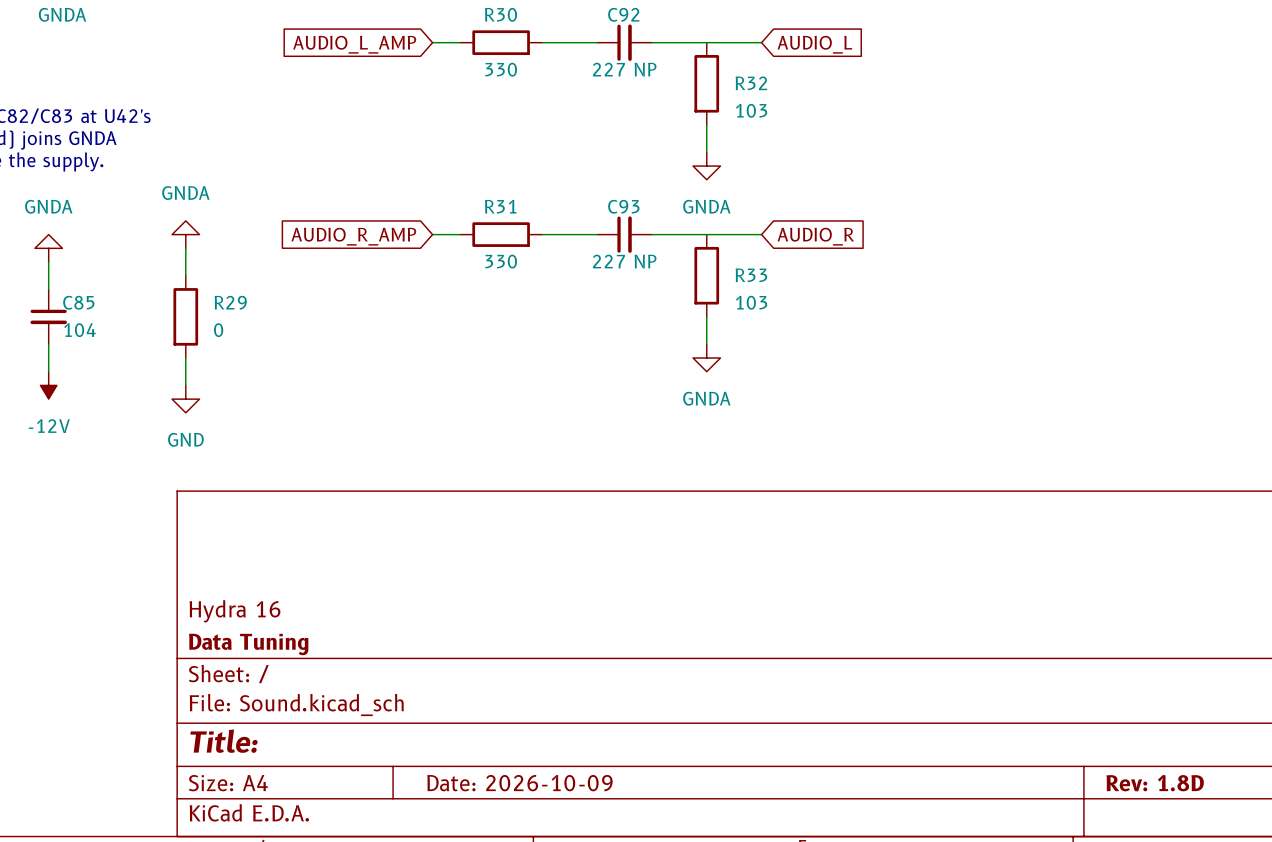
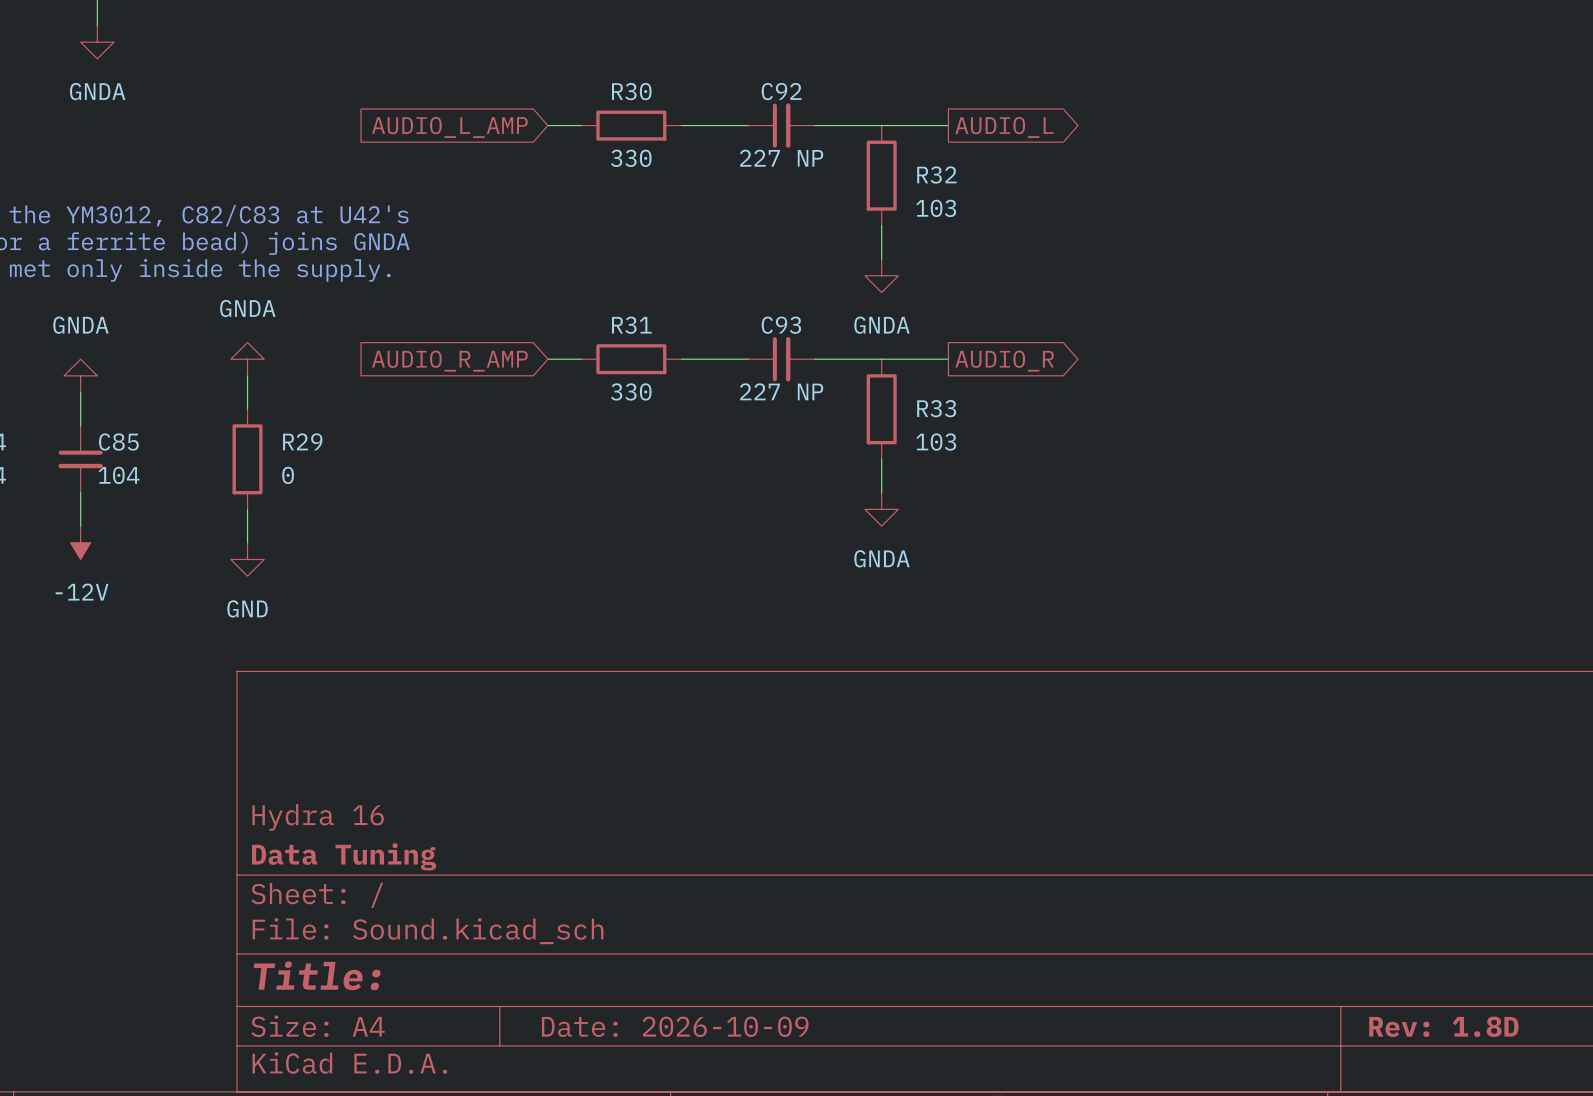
global label shape: input (814, 44) -> output (1004, 127)
global label shape: input (815, 236) -> output (1004, 361)

